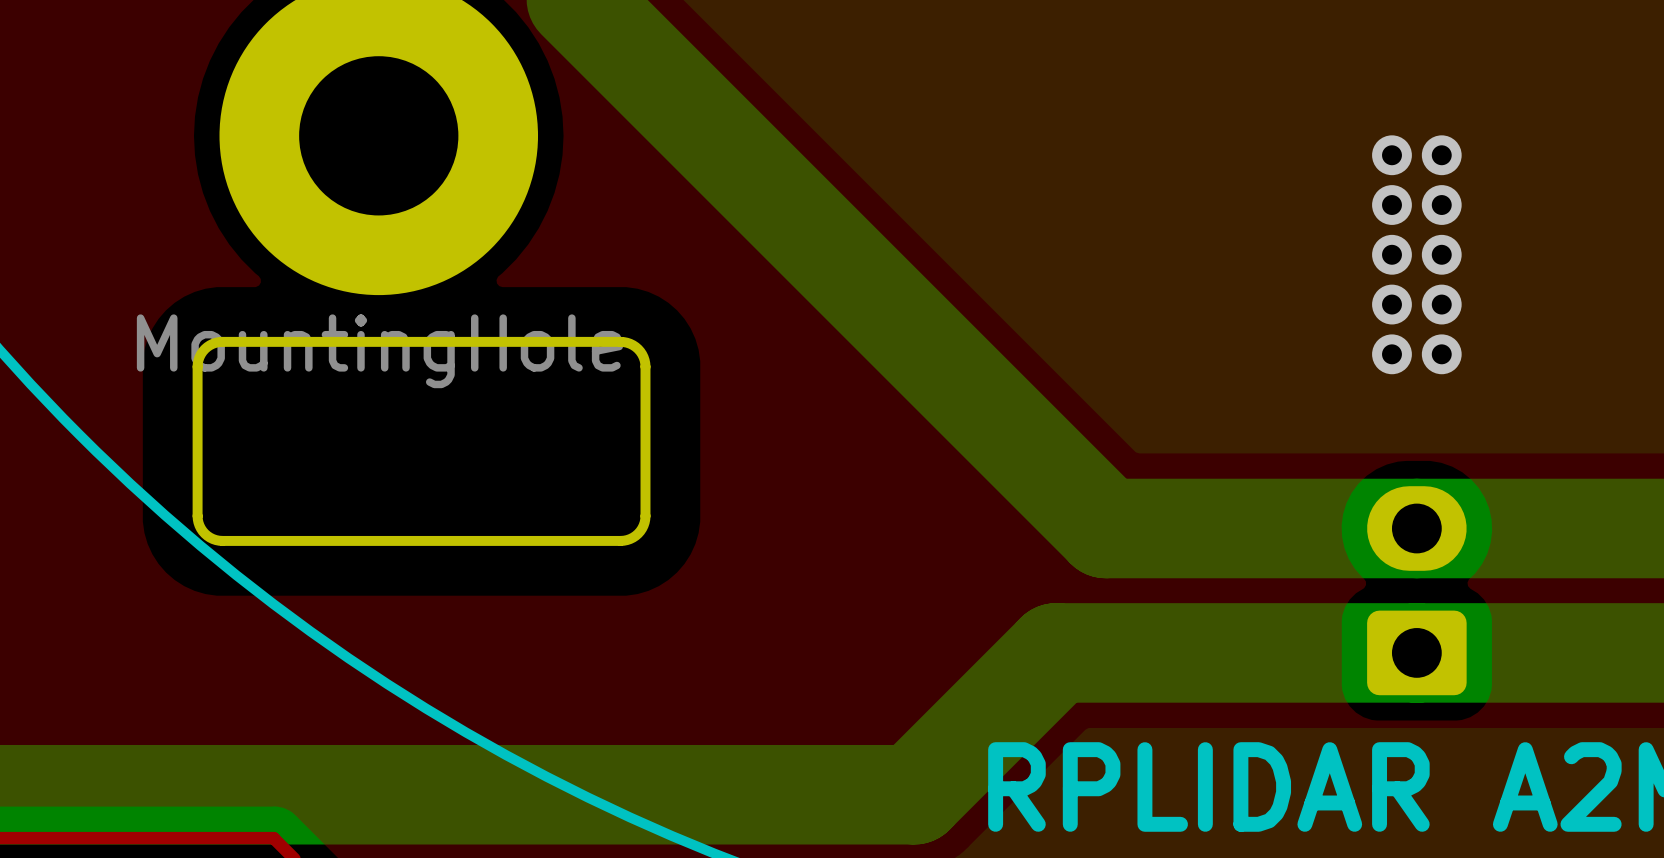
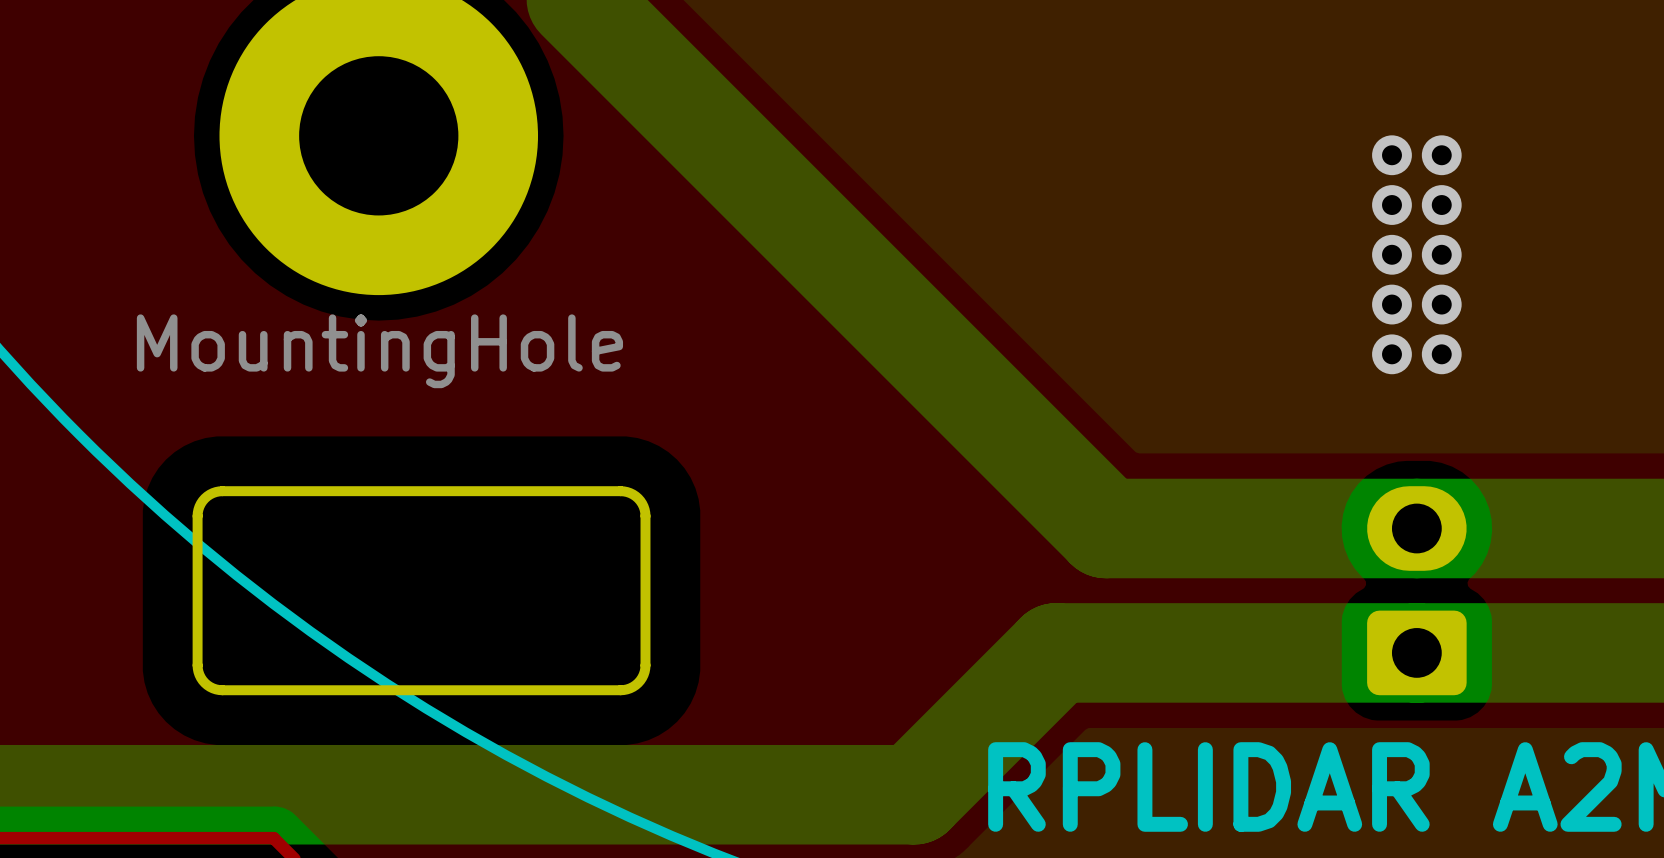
board edge: (222, 341) (620, 341) (630, 343) (640, 351) (645, 363) (645, 516) (643, 525) (635, 535) (620, 540) (222, 540) (212, 539) (202, 531) (197, 519) (197, 366) (199, 357) (204, 349) (212, 343) (222, 341) -> (222, 491) (620, 491) (630, 493) (640, 500) (645, 512) (645, 665) (643, 674) (635, 685) (620, 690) (222, 690) (212, 688) (202, 680) (197, 668) (197, 516) (199, 506) (204, 498) (212, 493) (222, 491)

